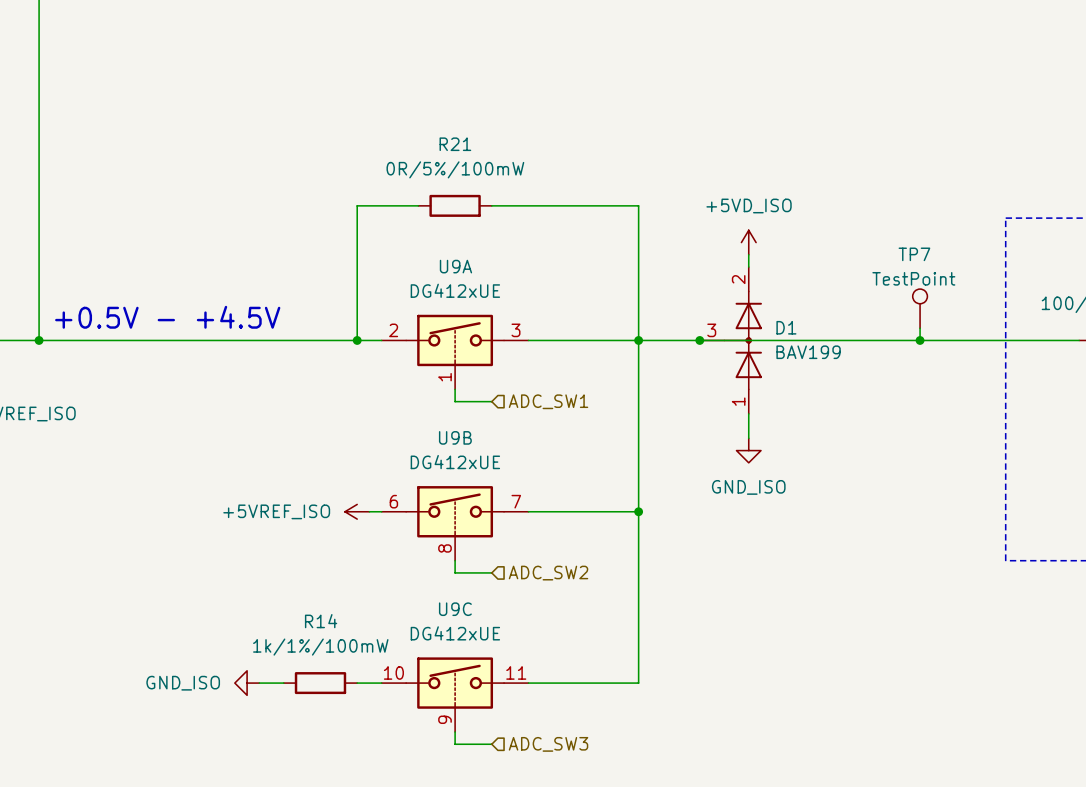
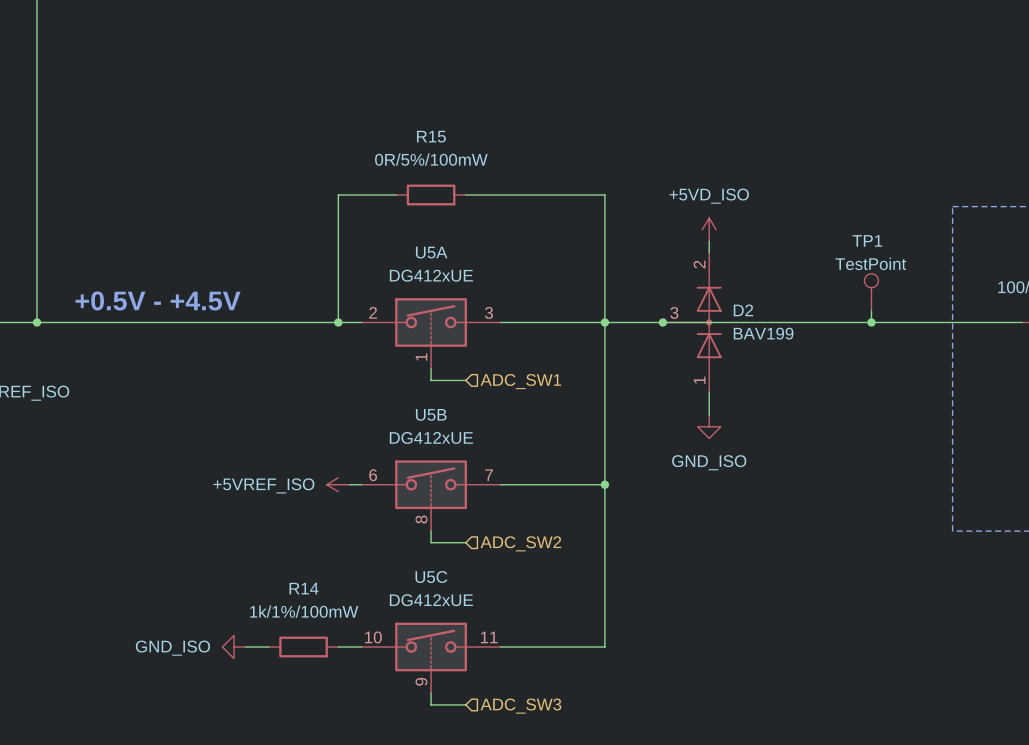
R21 name: R21 (455, 144) -> R15 (431, 136)
TP7 name: TP7 (914, 254) -> TP1 (867, 240)
U9A name: U9A (455, 266) -> U5A (431, 252)
D1 name: D1 (786, 327) -> D2 (743, 310)
U9B name: U9B (455, 437) -> U5B (431, 414)
U9C name: U9C (455, 609) -> U5C (431, 577)

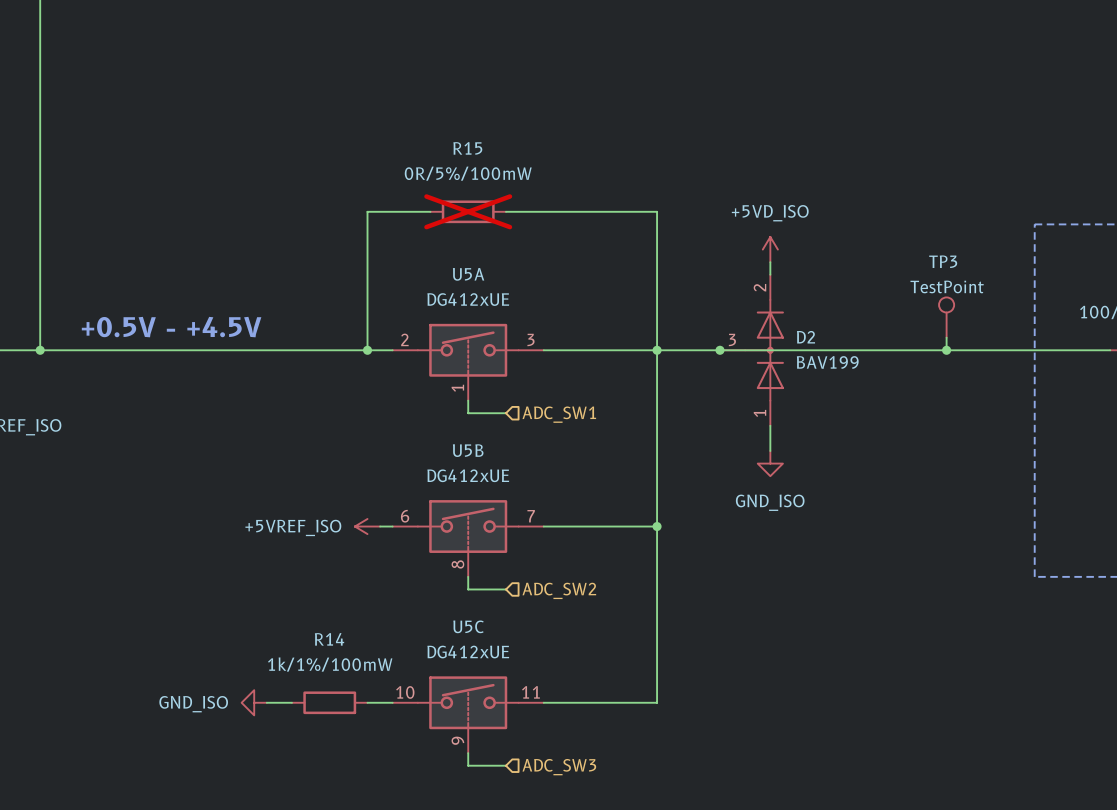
R15 do-not-place cross: none -> (468, 211)
TP1 name: TP1 (867, 240) -> TP3 (943, 261)

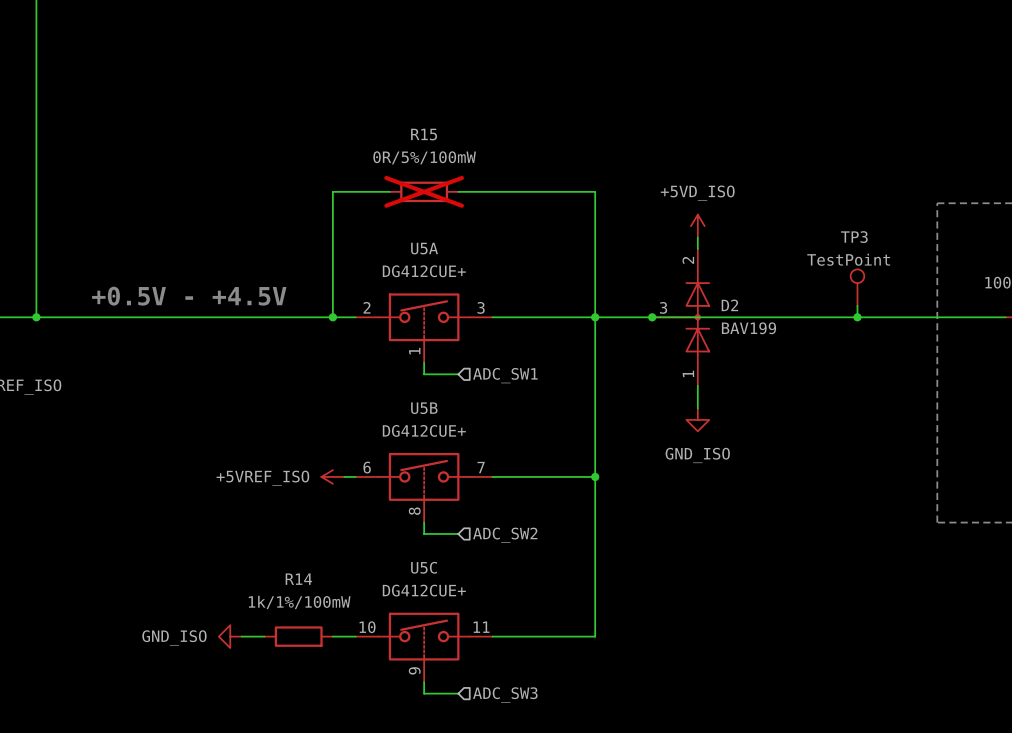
U5A value: DG412xUE (468, 299) -> DG412CUE+ (424, 271)
text position: +0.5V - +4.5V (171, 327) -> +0.5V - +4.5V (189, 296)
U5B value: DG412xUE (468, 475) -> DG412CUE+ (424, 430)
U5C value: DG412xUE (468, 652) -> DG412CUE+ (424, 590)

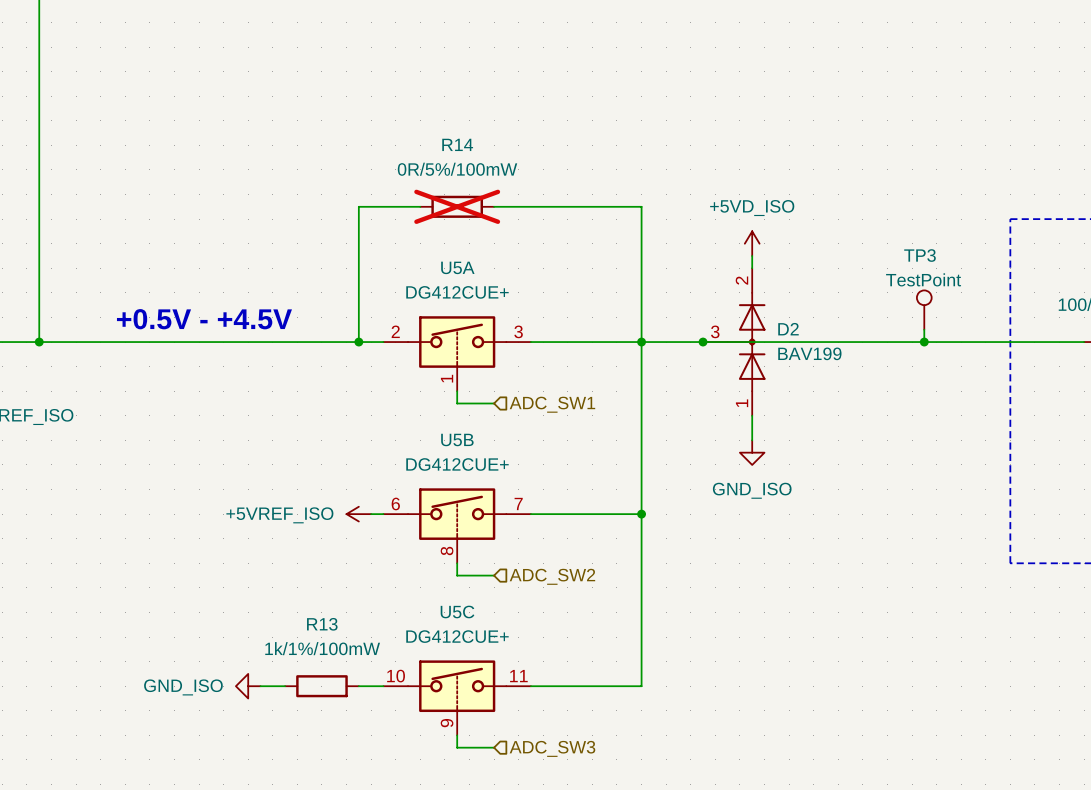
R15 name: R15 (424, 134) -> R14 (457, 144)
R14 name: R14 (298, 579) -> R13 (322, 624)

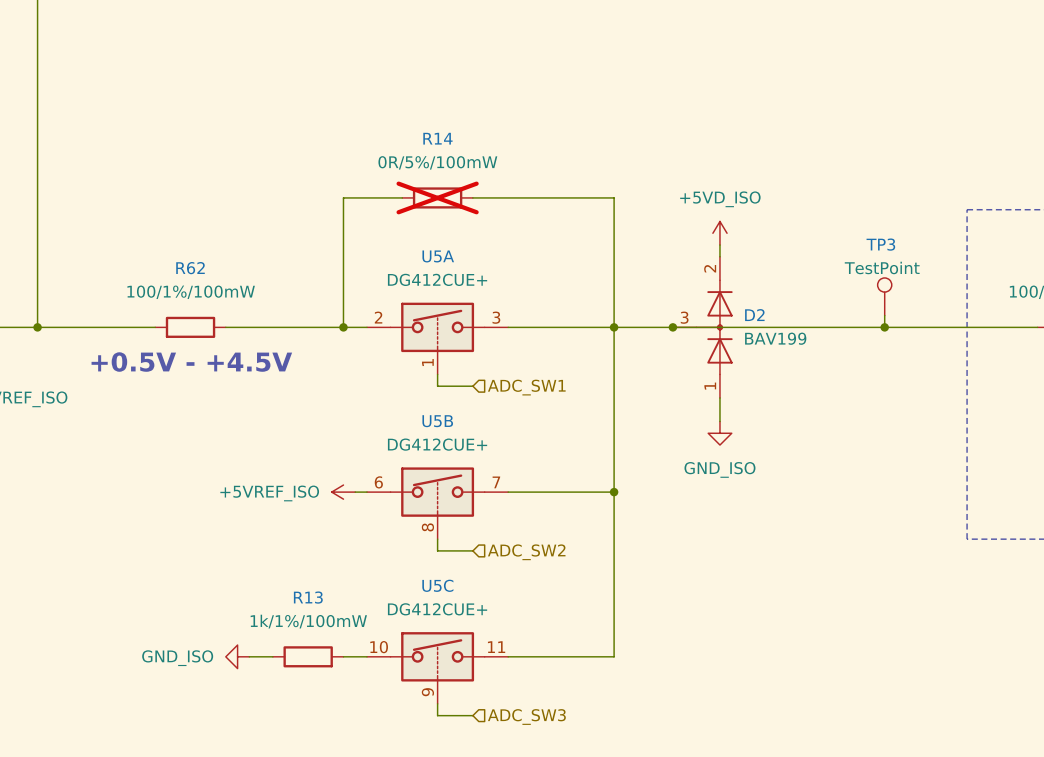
text position: +0.5V - +4.5V (204, 319) -> +0.5V - +4.5V (191, 362)
wire: (162, 342) (235, 342) -> none
R62: none -> 100/1%/100mW (190, 327)

